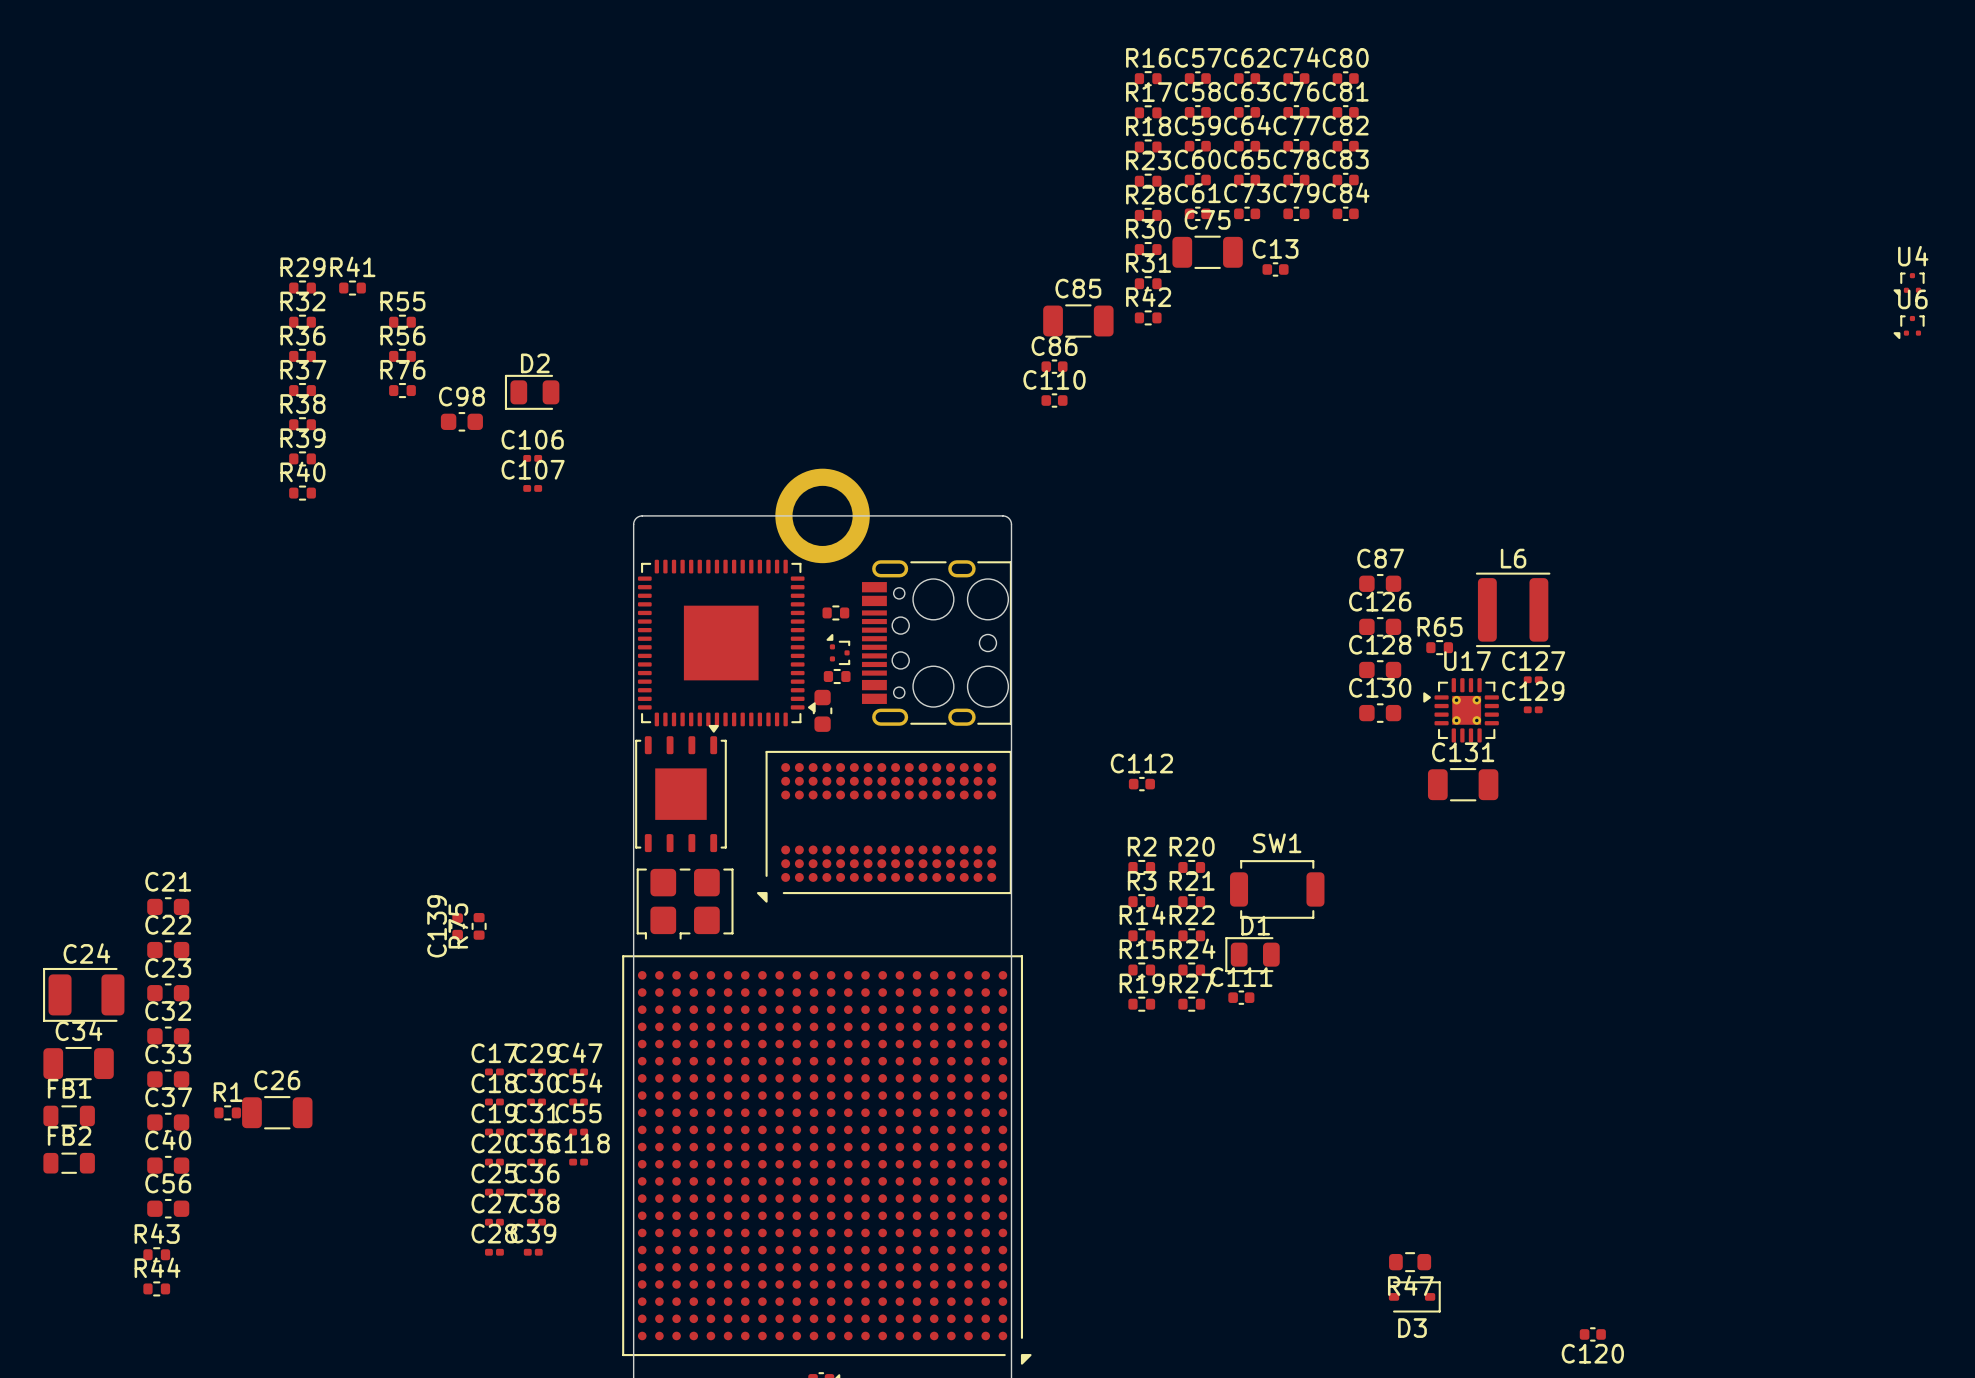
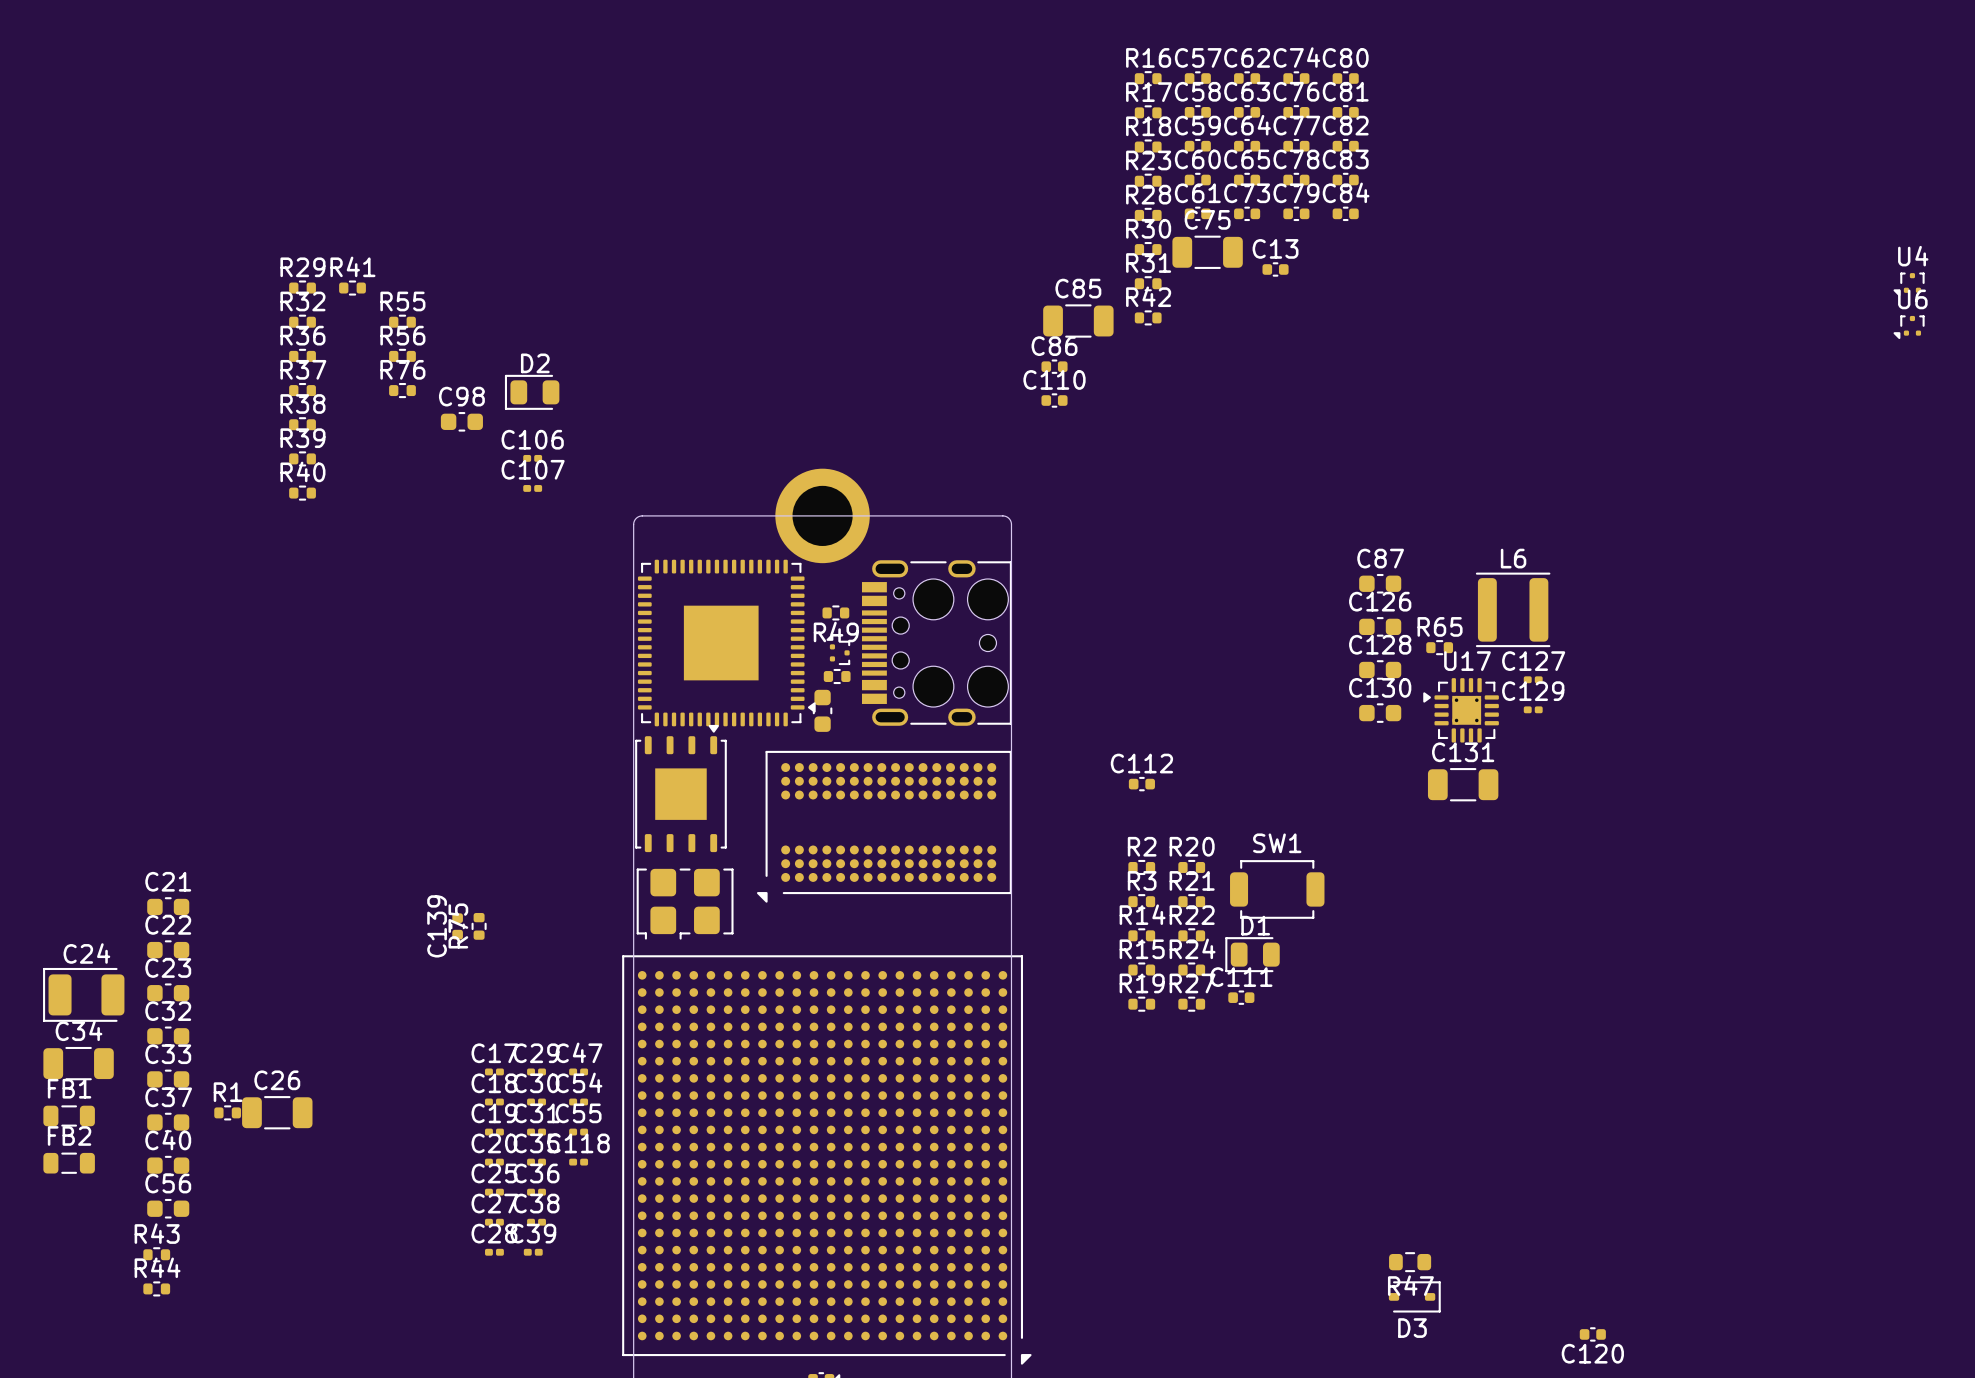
R49 name: none -> R49 (836, 632)

